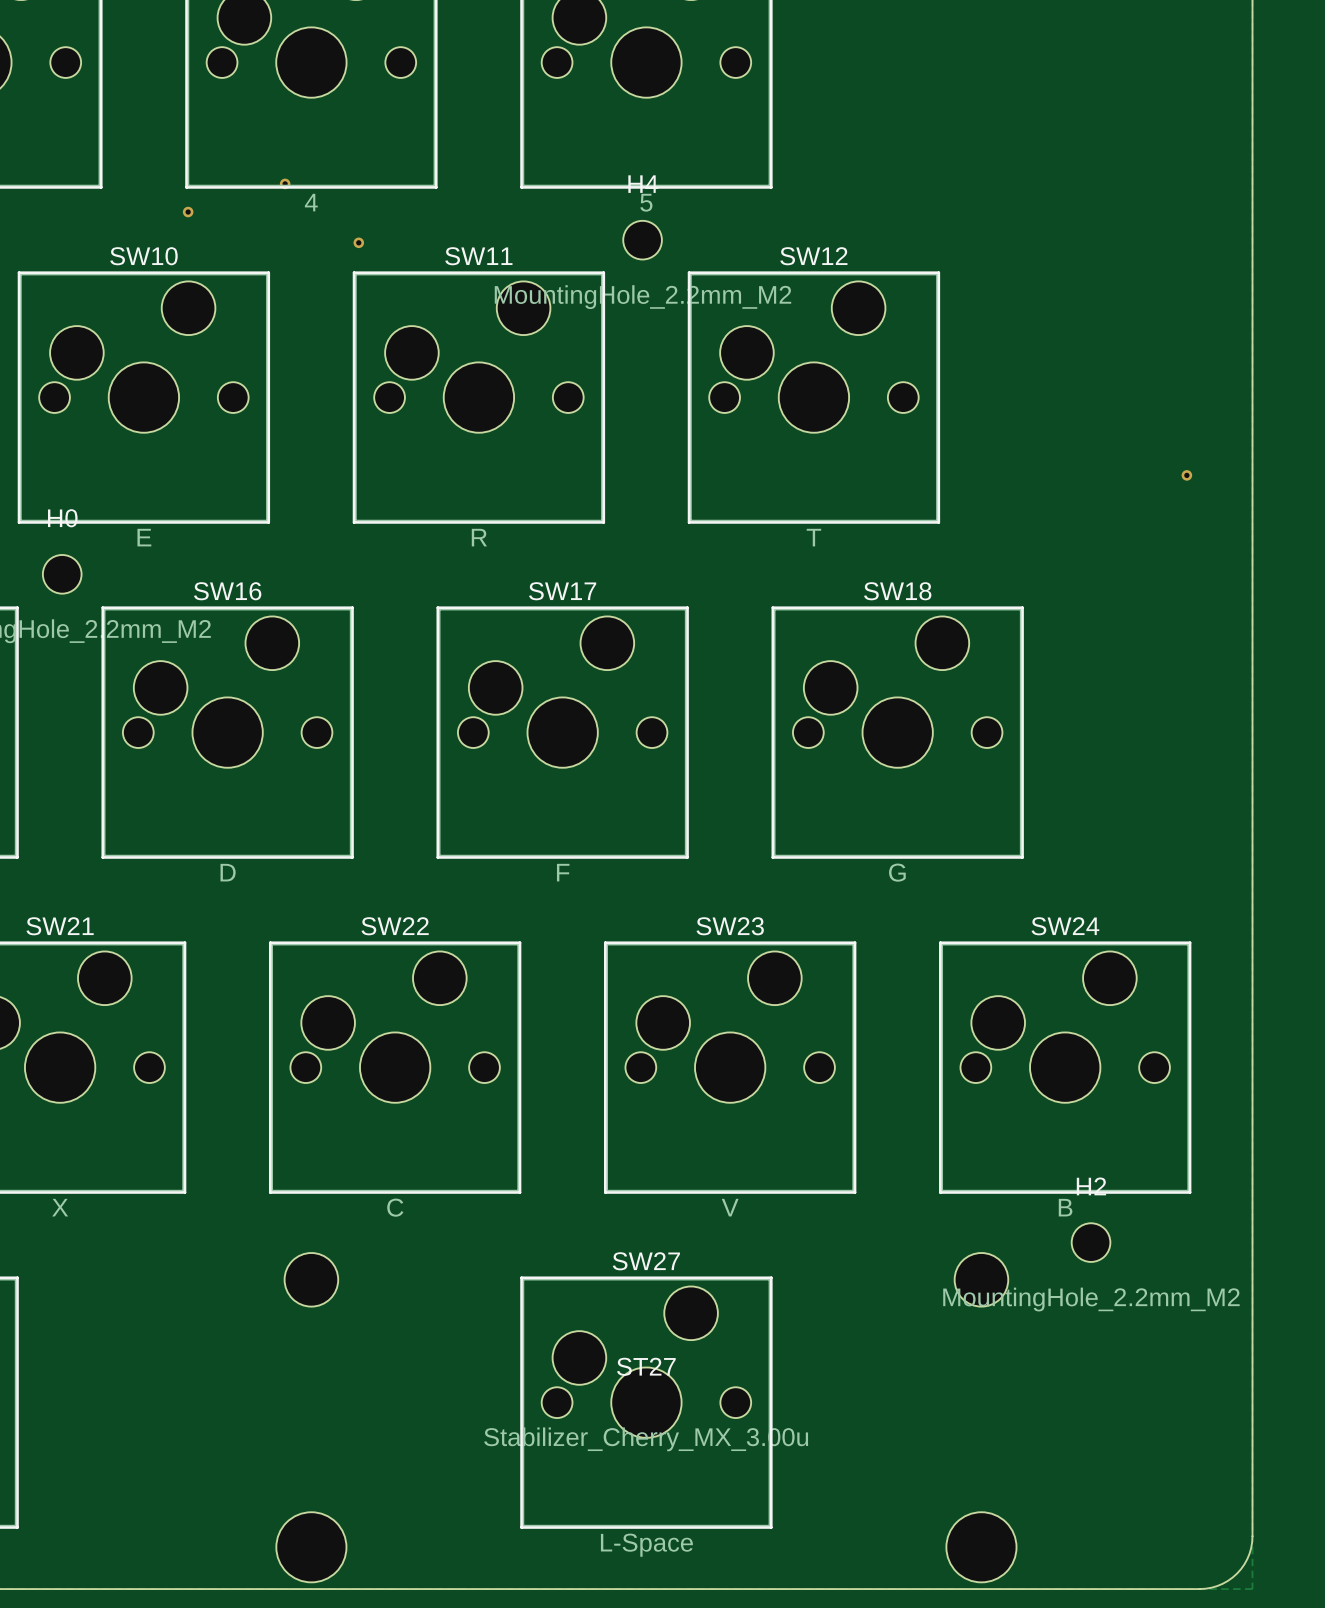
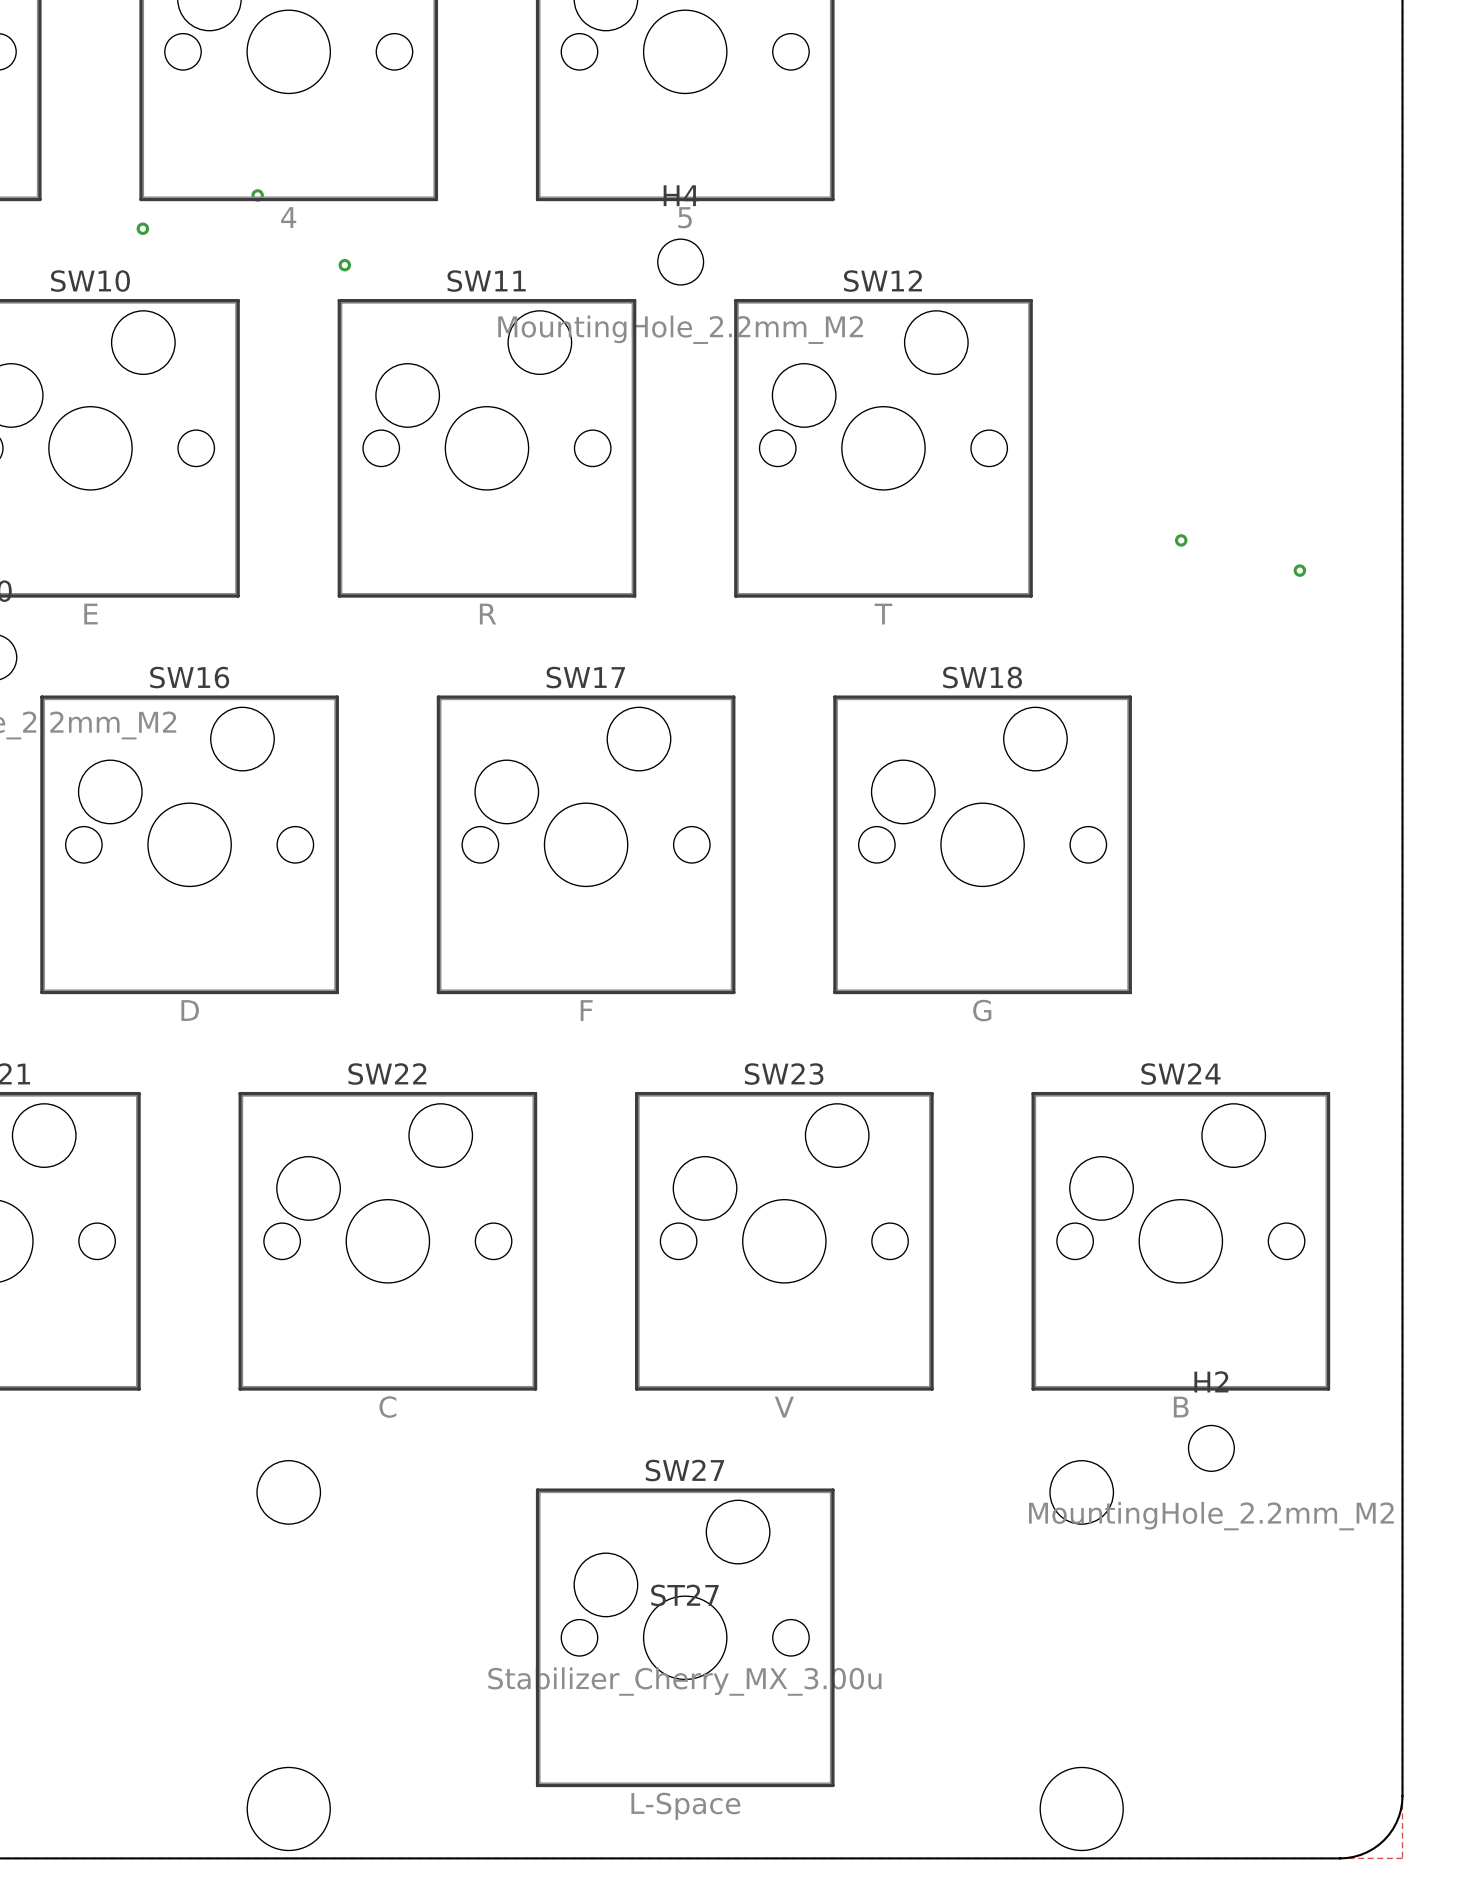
via: none -> (1181, 540)
via position: (1186, 475) -> (1299, 570)

